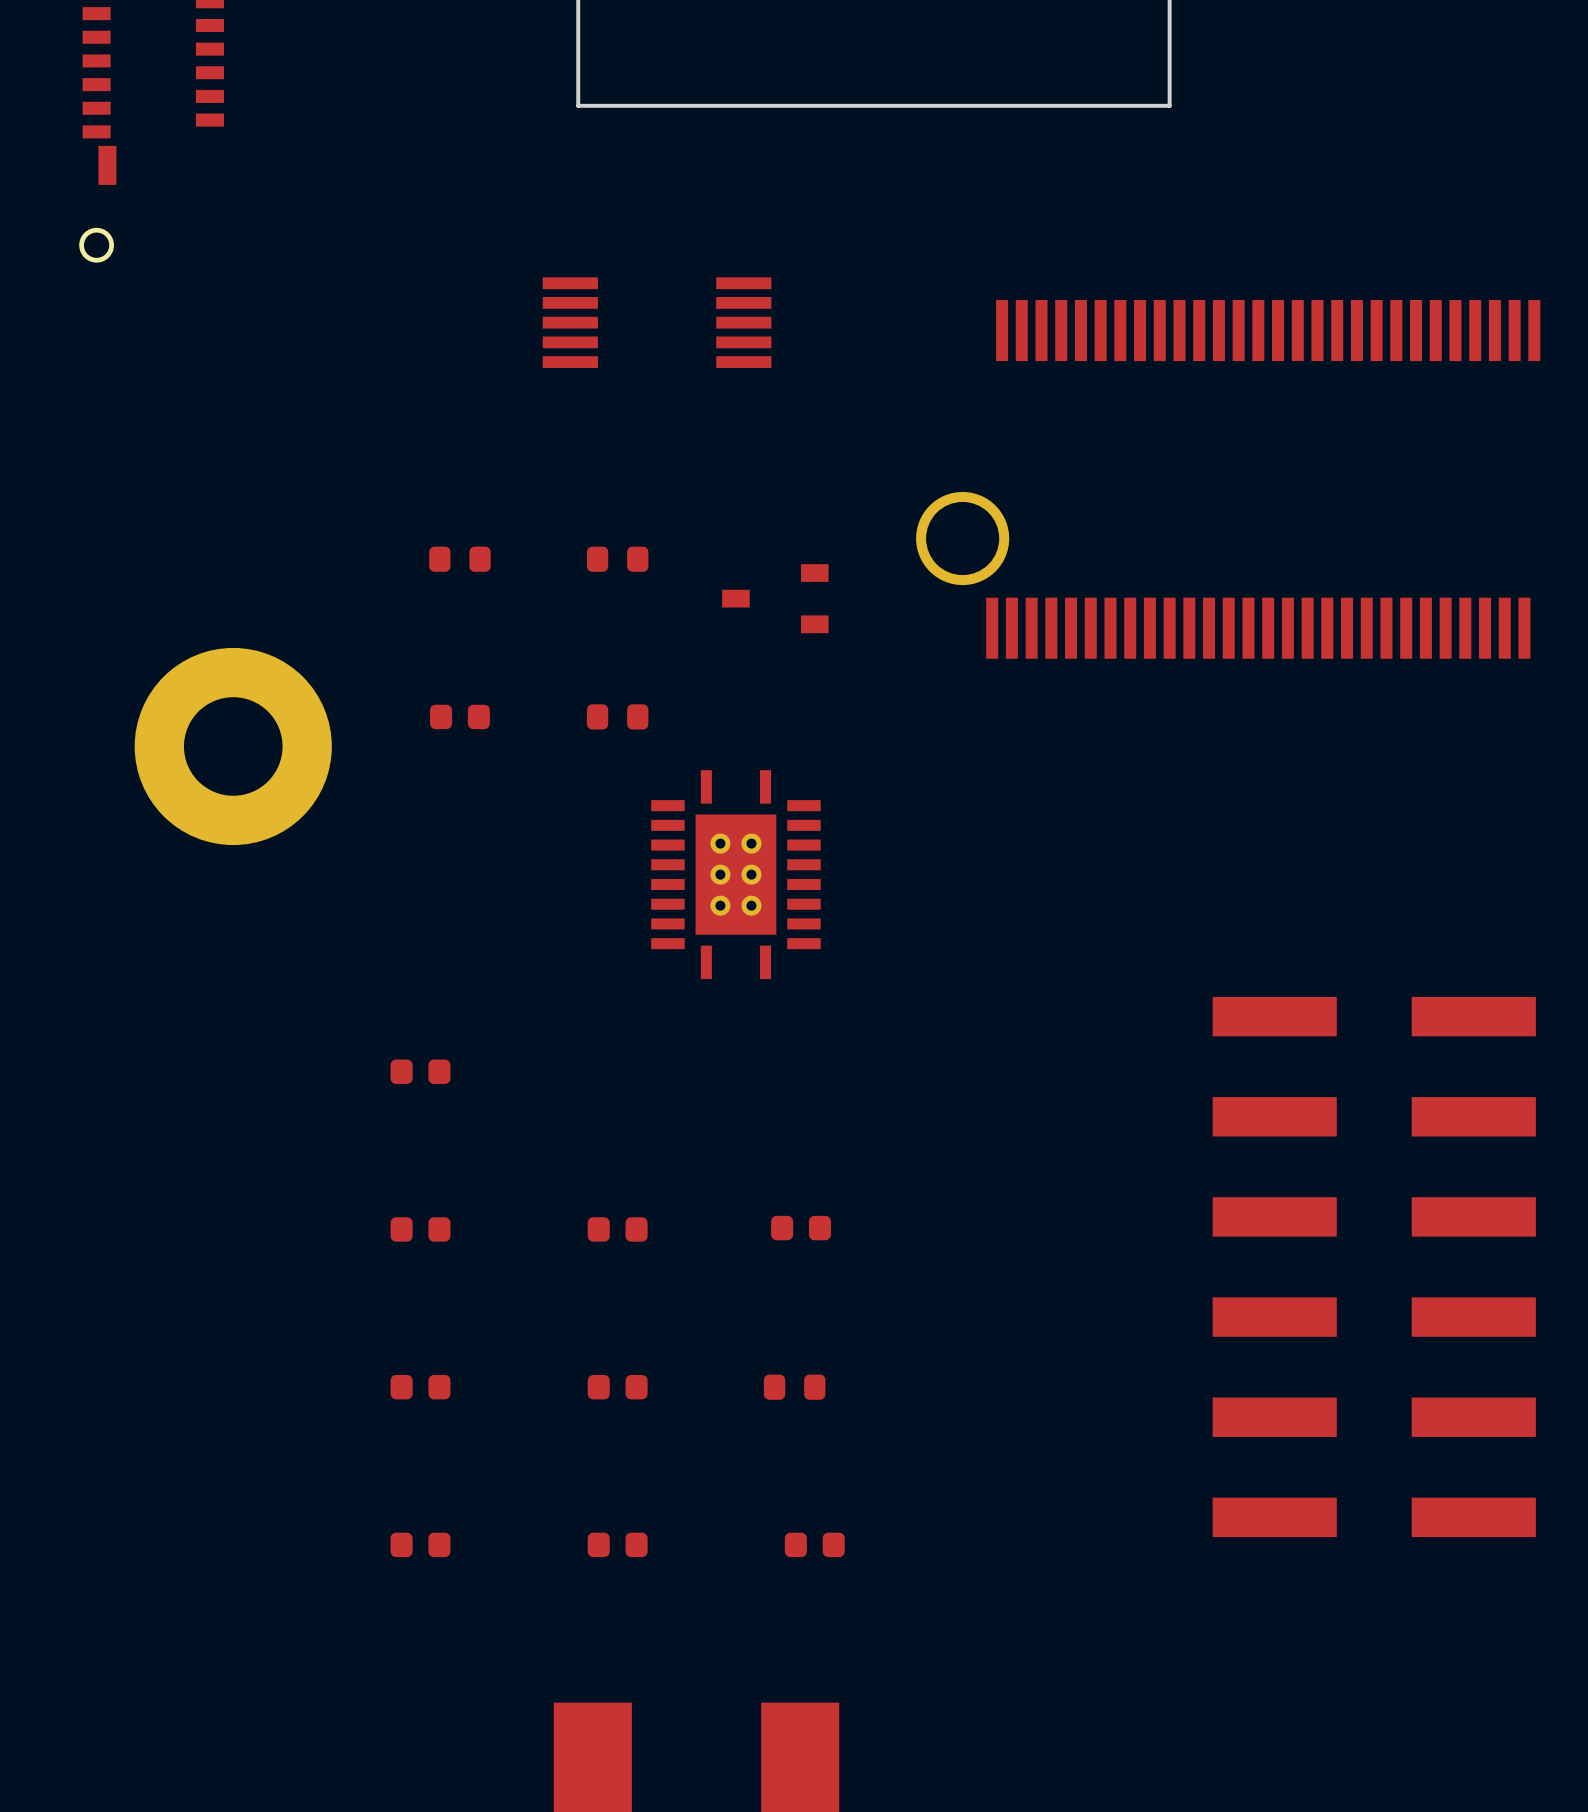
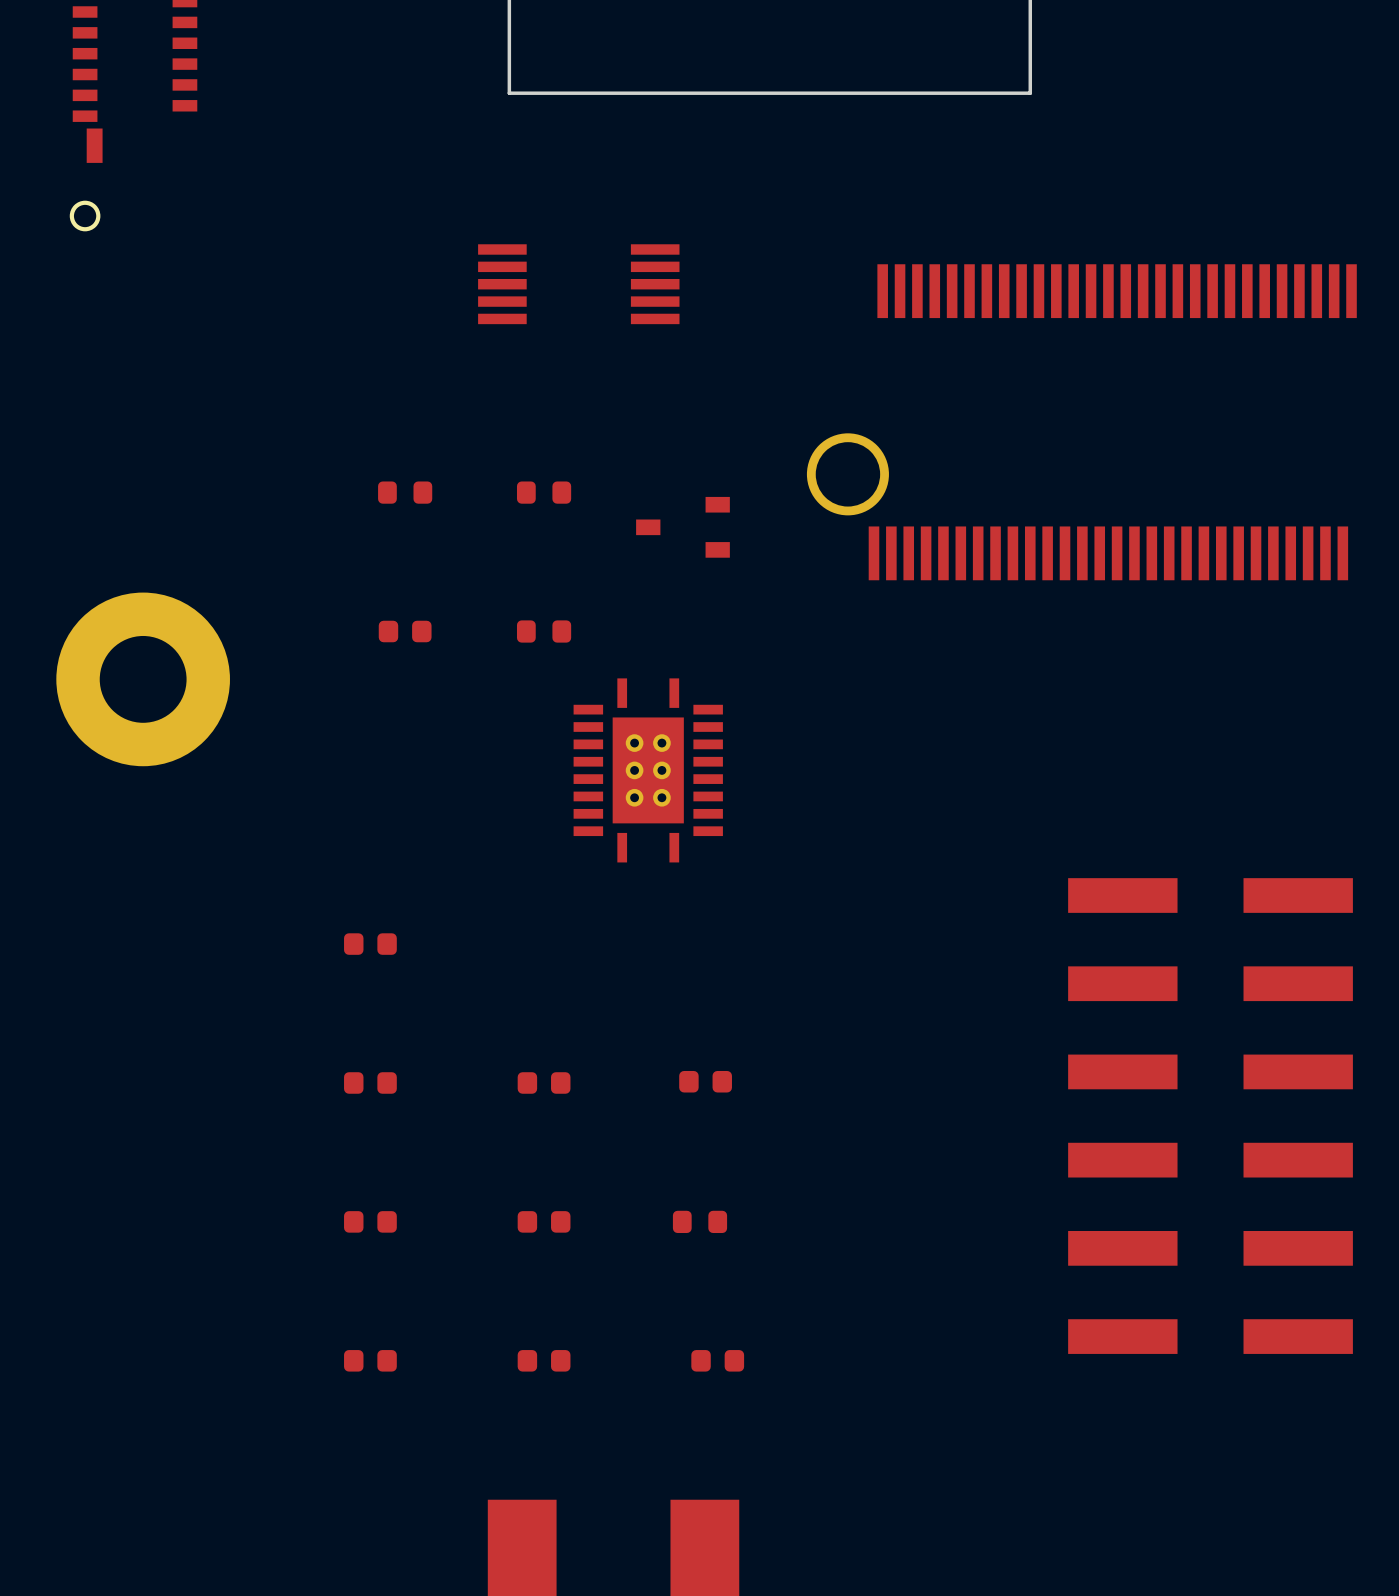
part position: (233, 746) -> (143, 679)

